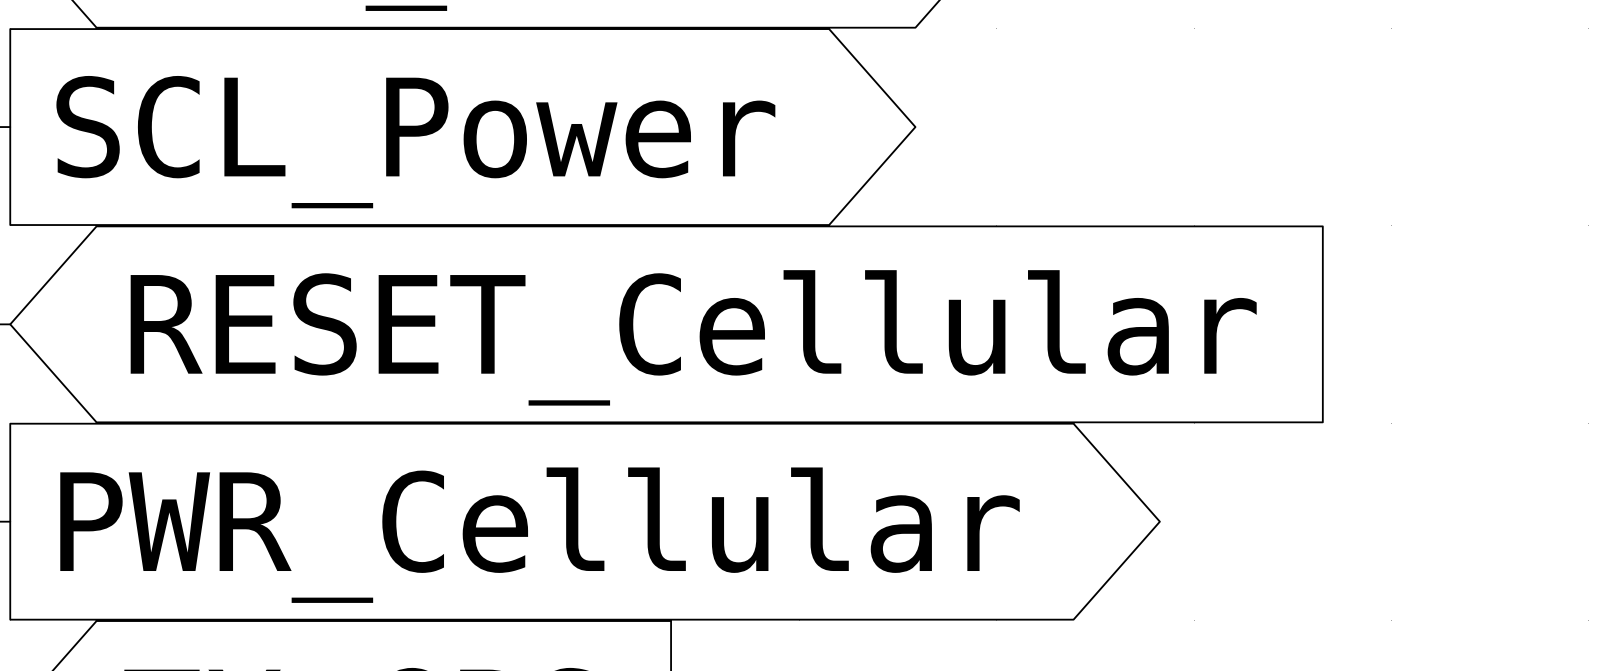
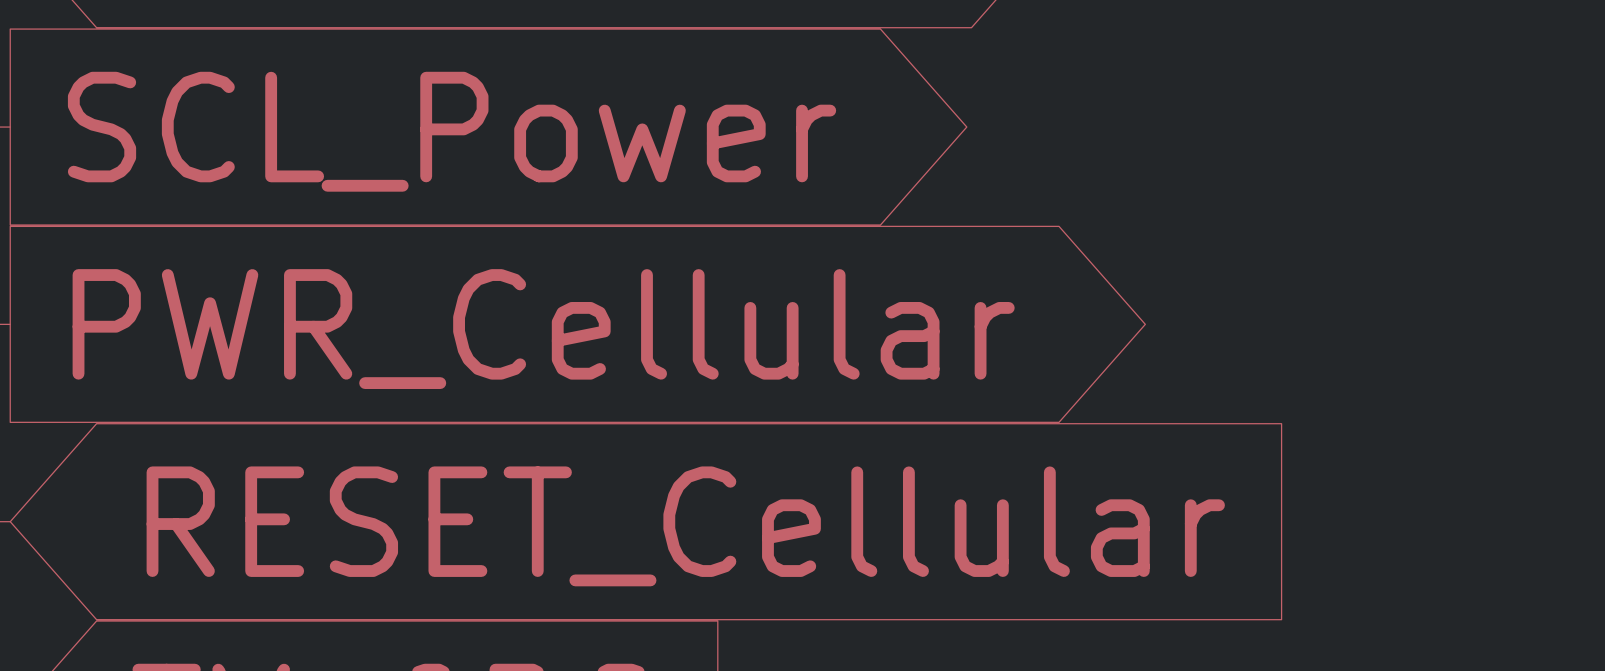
global label shape: input (693, 337) -> output (543, 329)
global label: RESET_Cellular (693, 337) -> PWR_Cellular (543, 329)
global label shape: output (540, 535) -> input (685, 526)
global label: PWR_Cellular (540, 535) -> RESET_Cellular (685, 526)

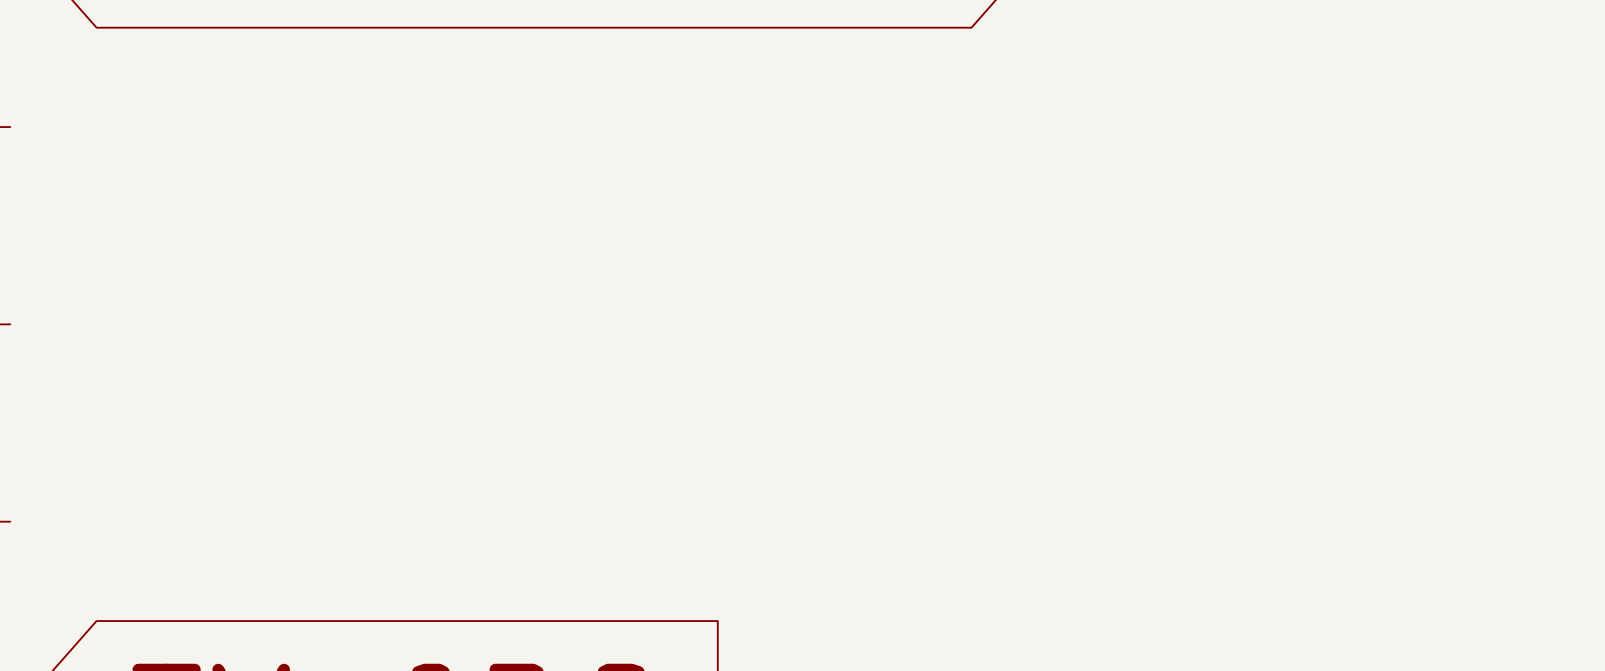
global label: SCL_Power (452, 131) -> none
global label: PWR_Cellular (543, 329) -> none
global label: RESET_Cellular (685, 526) -> none

